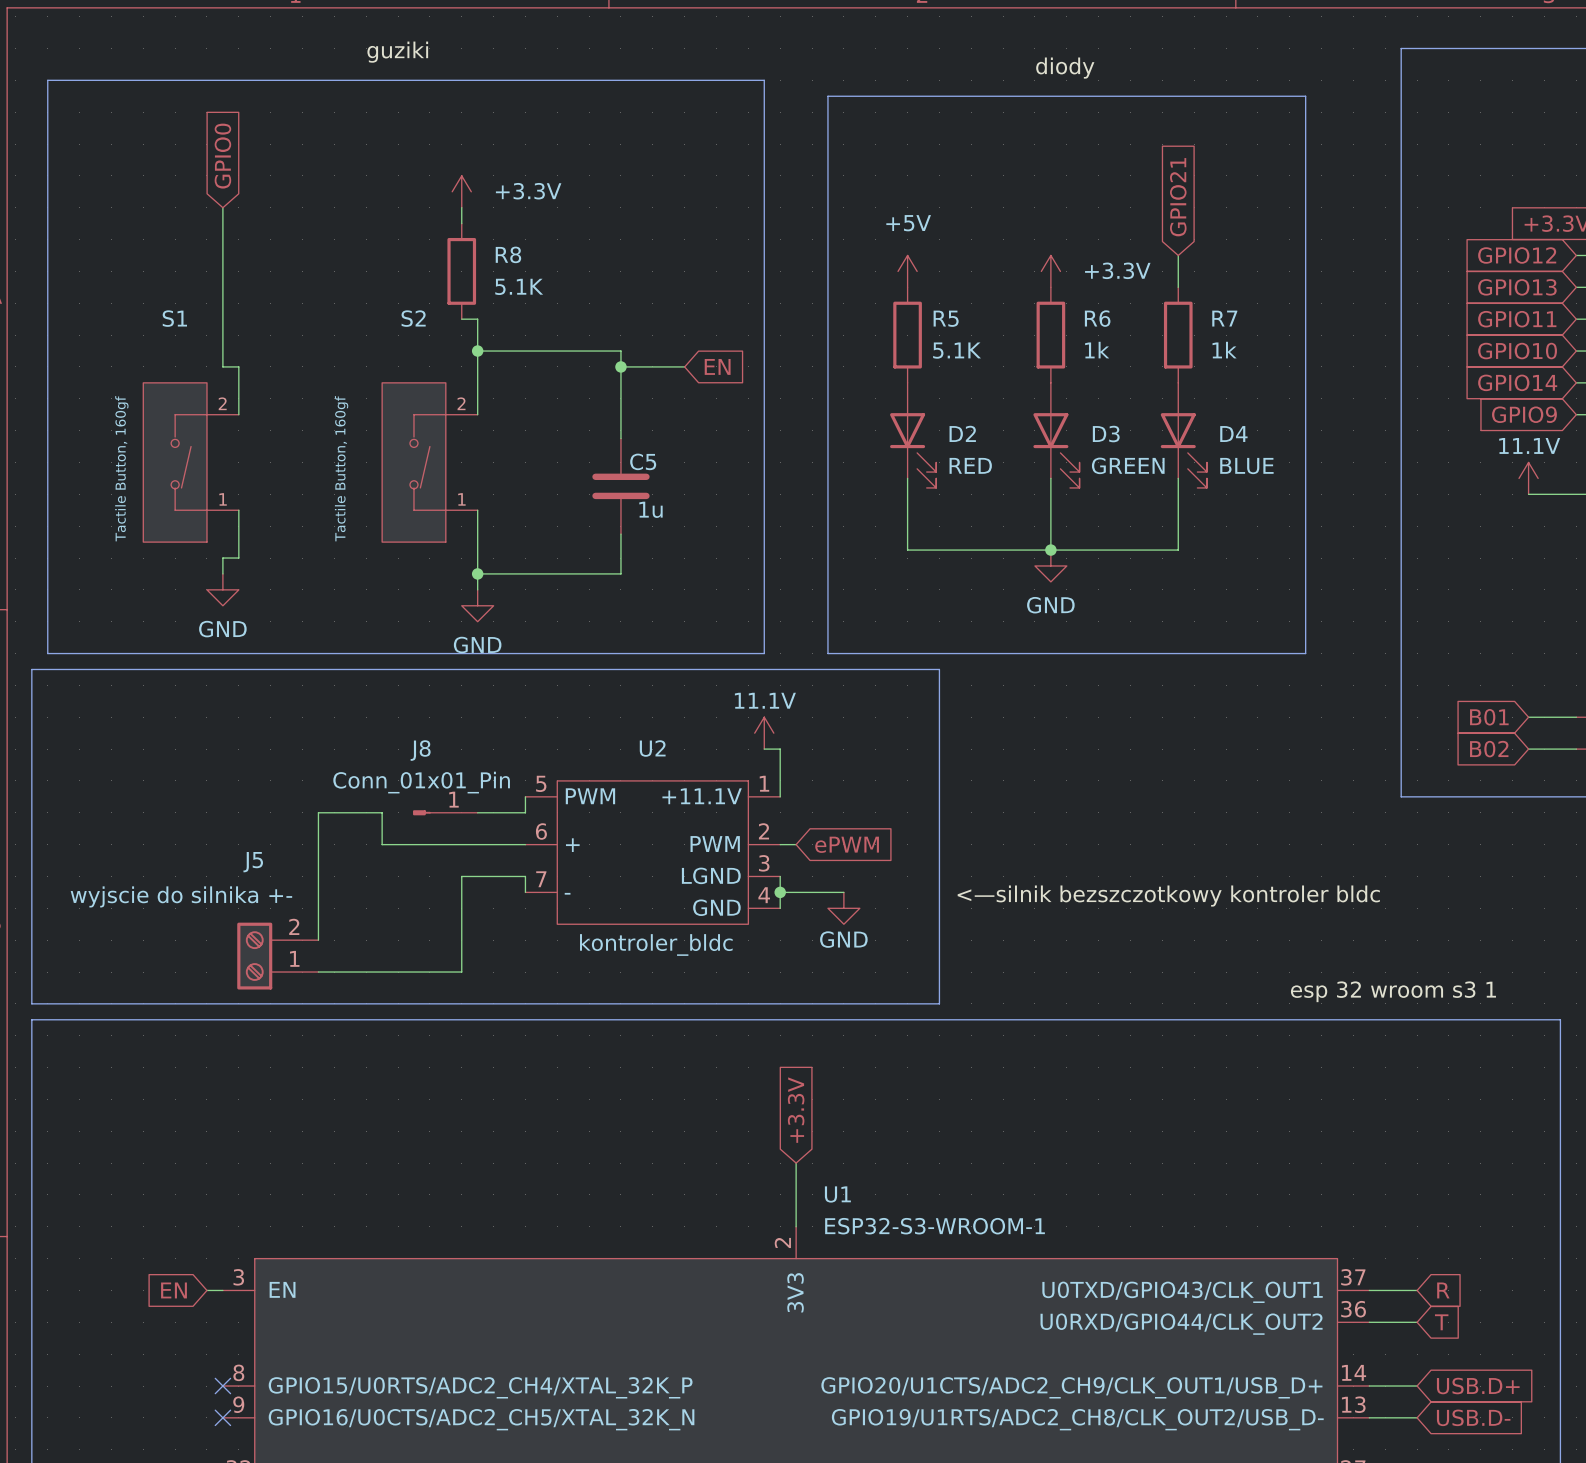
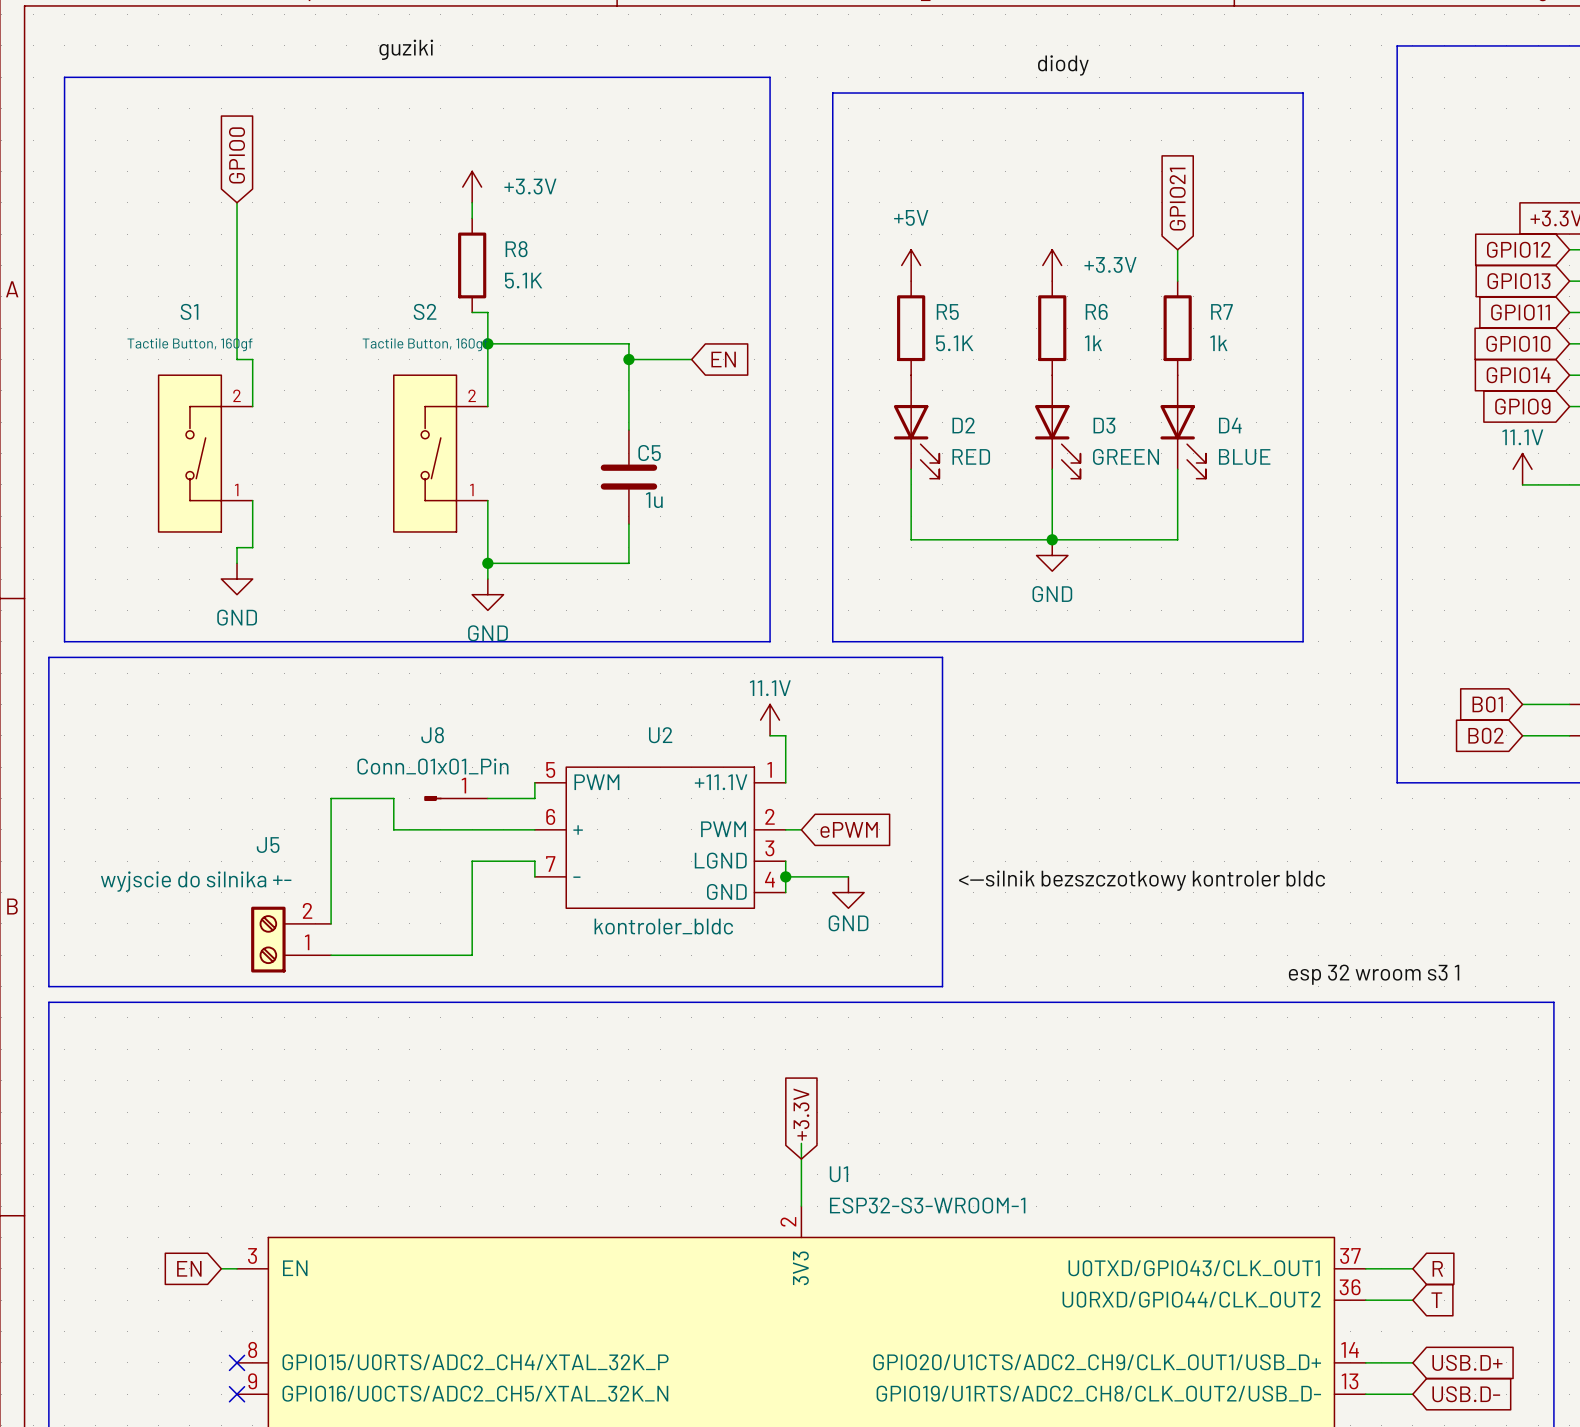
S1 value rotation: 0° (121, 468) -> 90° clockwise (189, 344)
S2 value rotation: 0° (341, 468) -> 90° clockwise (425, 344)
global label position: +3.3V (796, 1110) -> +3.3V (801, 1114)

